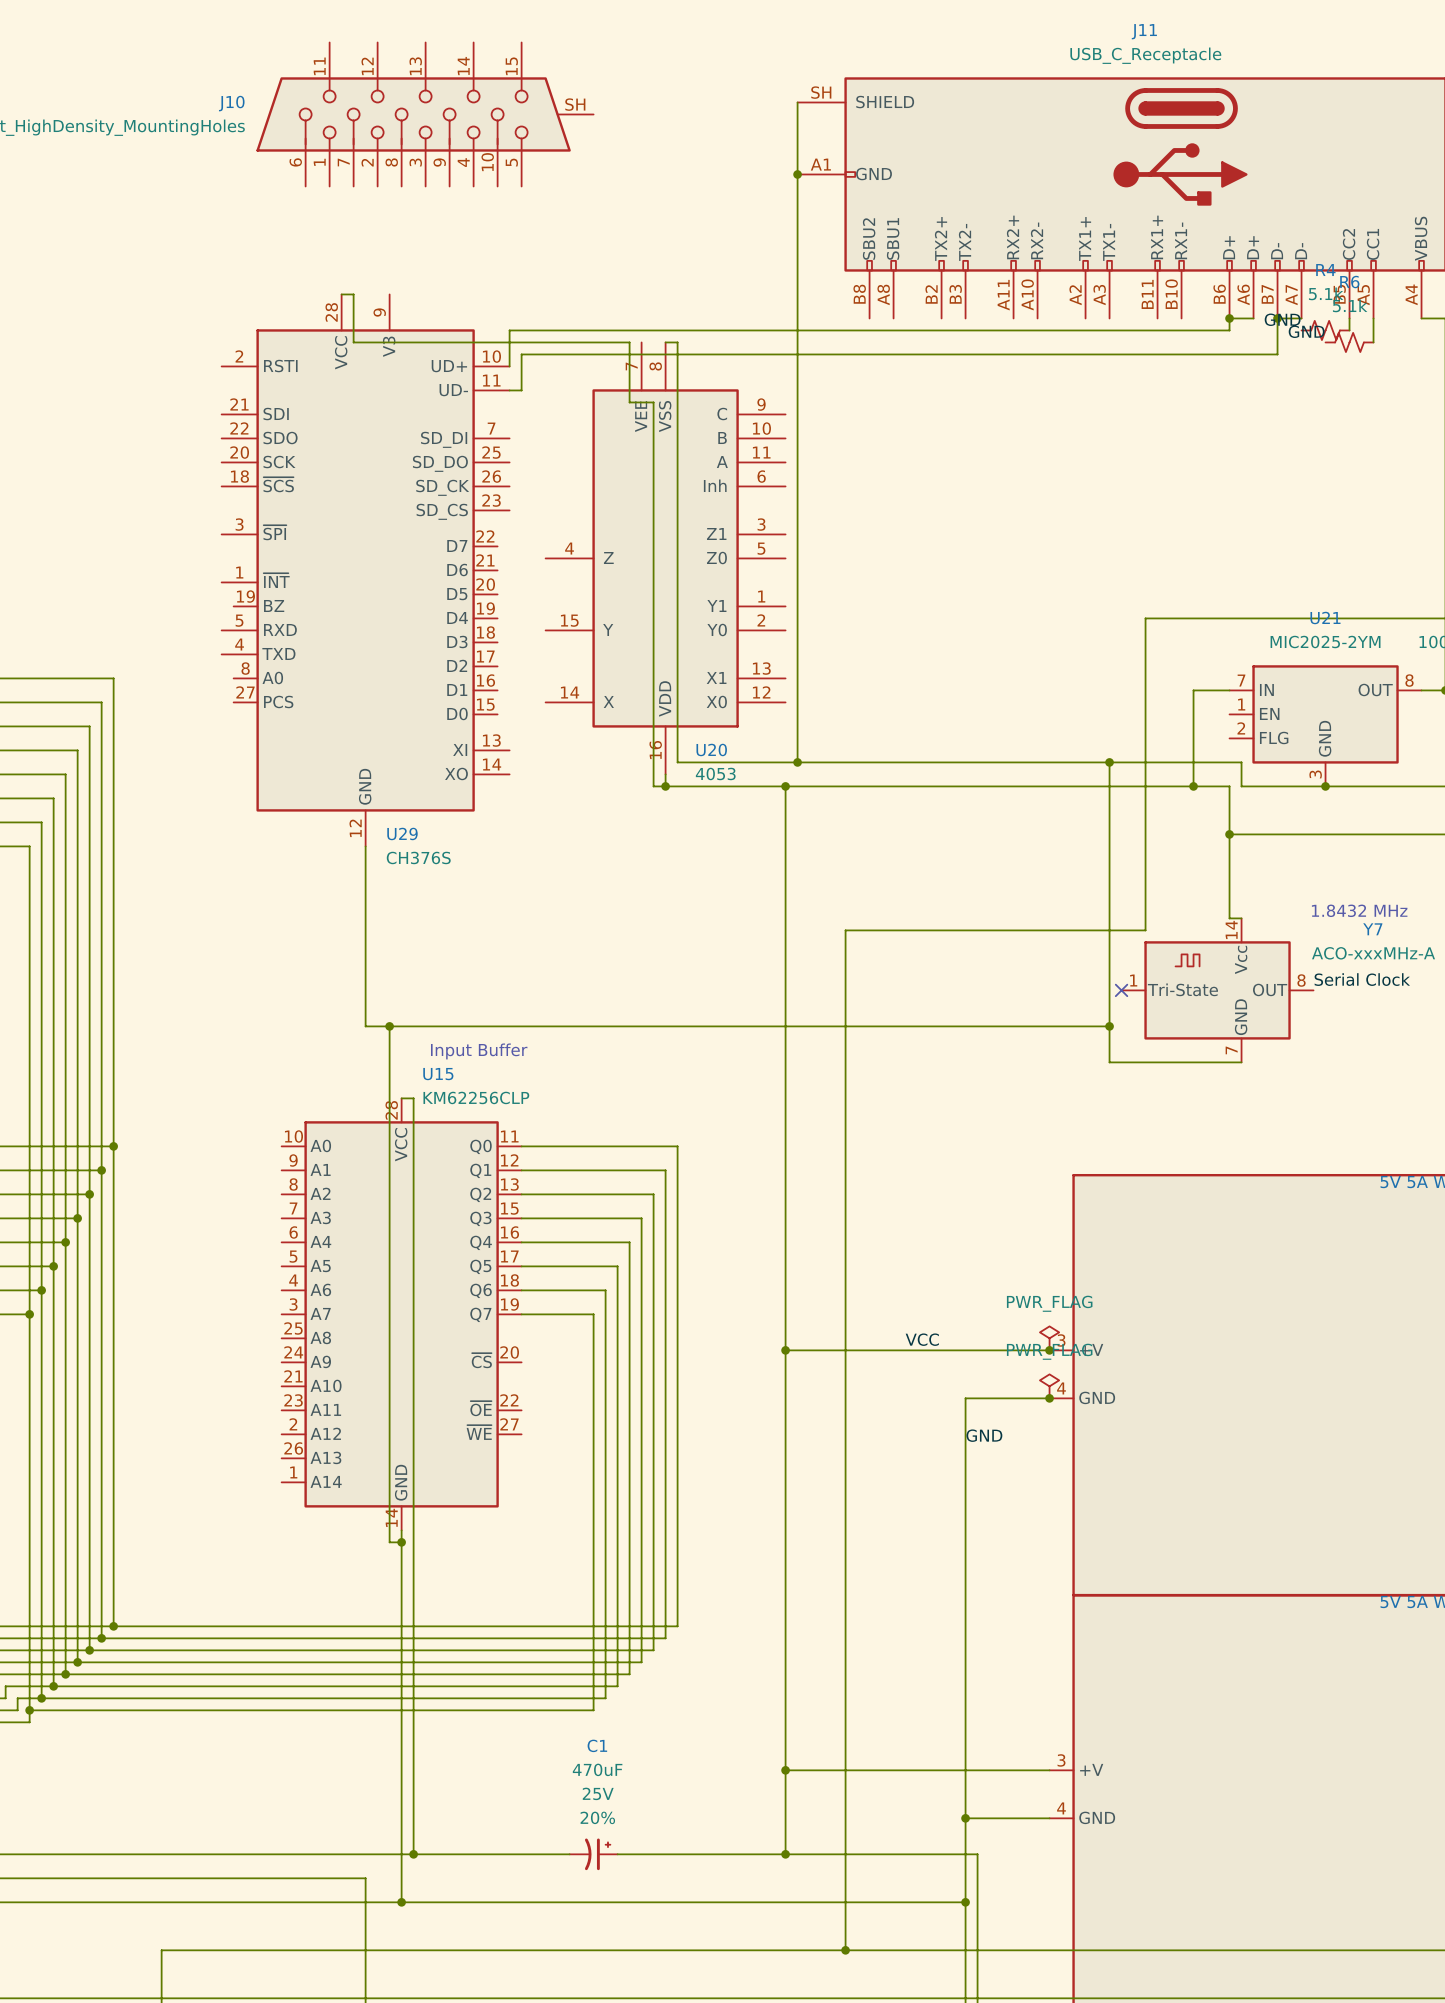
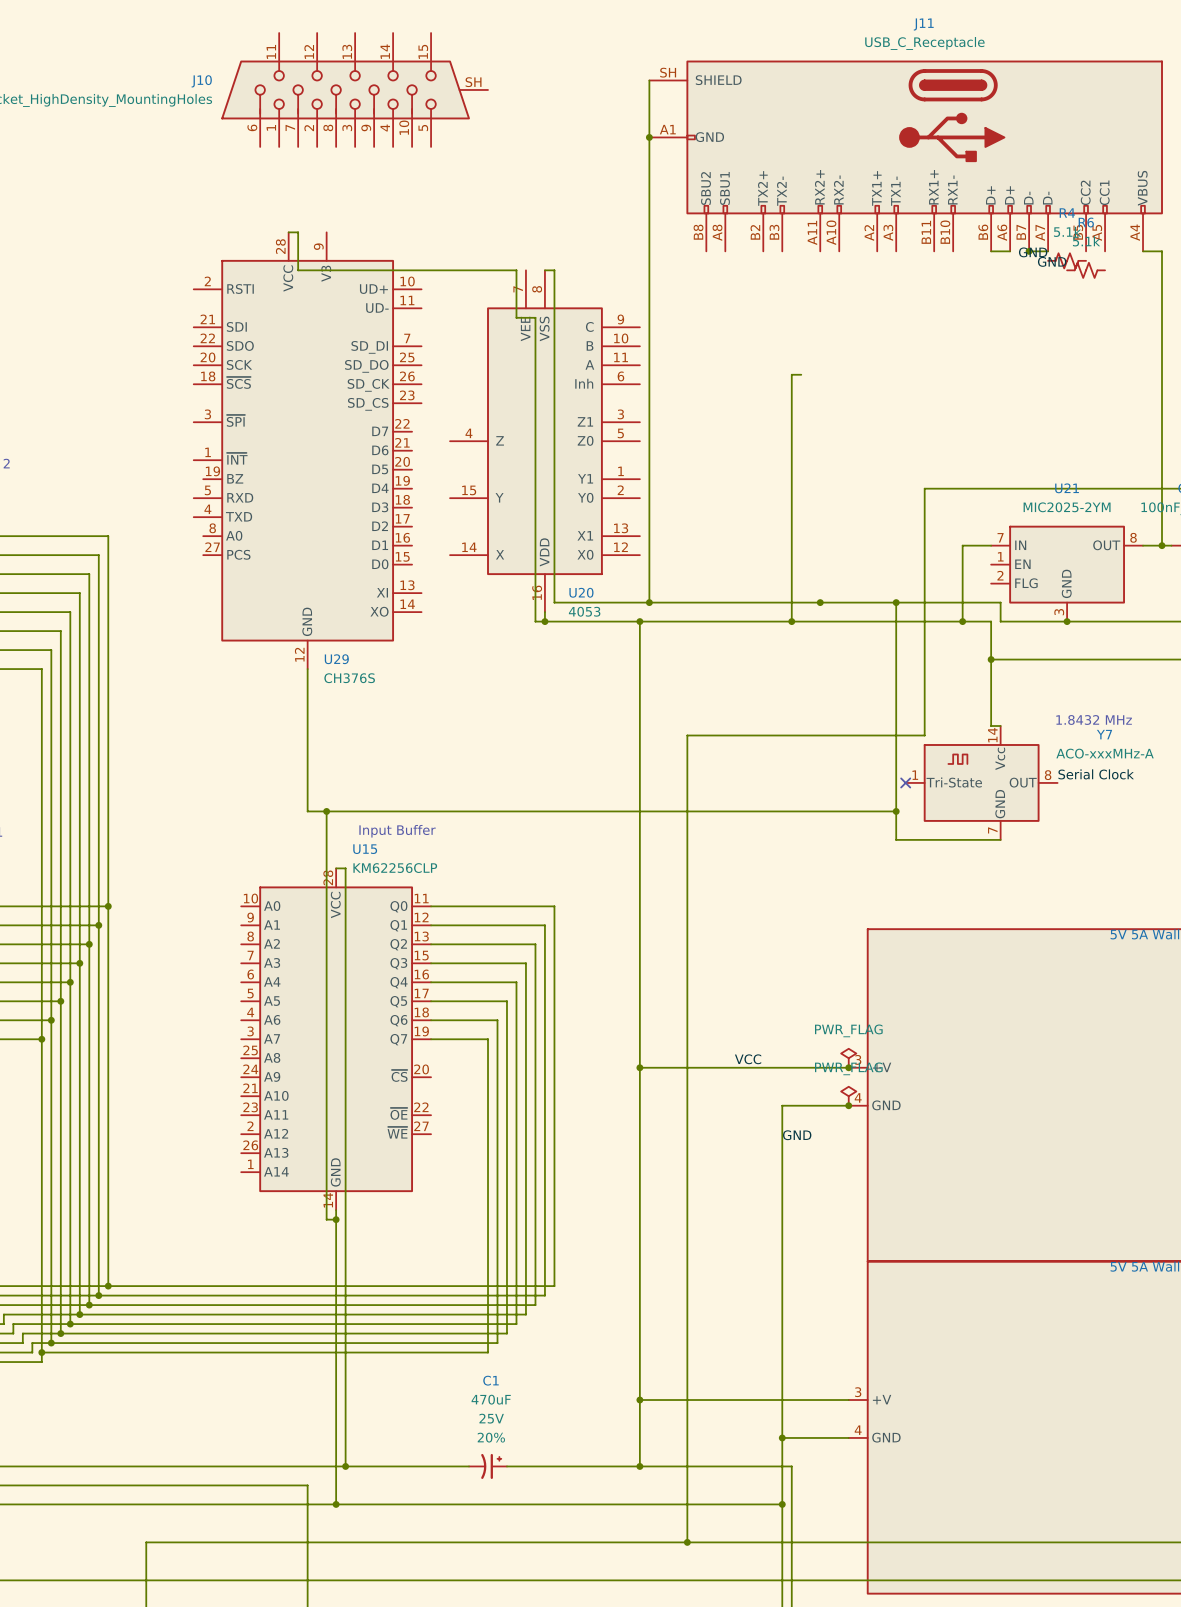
wire: (1229, 318) (1229, 330) (509, 330) (509, 366) -> none
junction: (1229, 318) -> none
wire: (1277, 318) (1277, 354) (521, 354) (521, 390) (509, 390) -> none
wire: (1349, 318) (1349, 330) -> none
wire: (1373, 318) (1373, 342) -> none
wire: none -> (801, 374) (791, 374) (791, 621)
junction: none -> (820, 602)
junction: none -> (791, 621)

